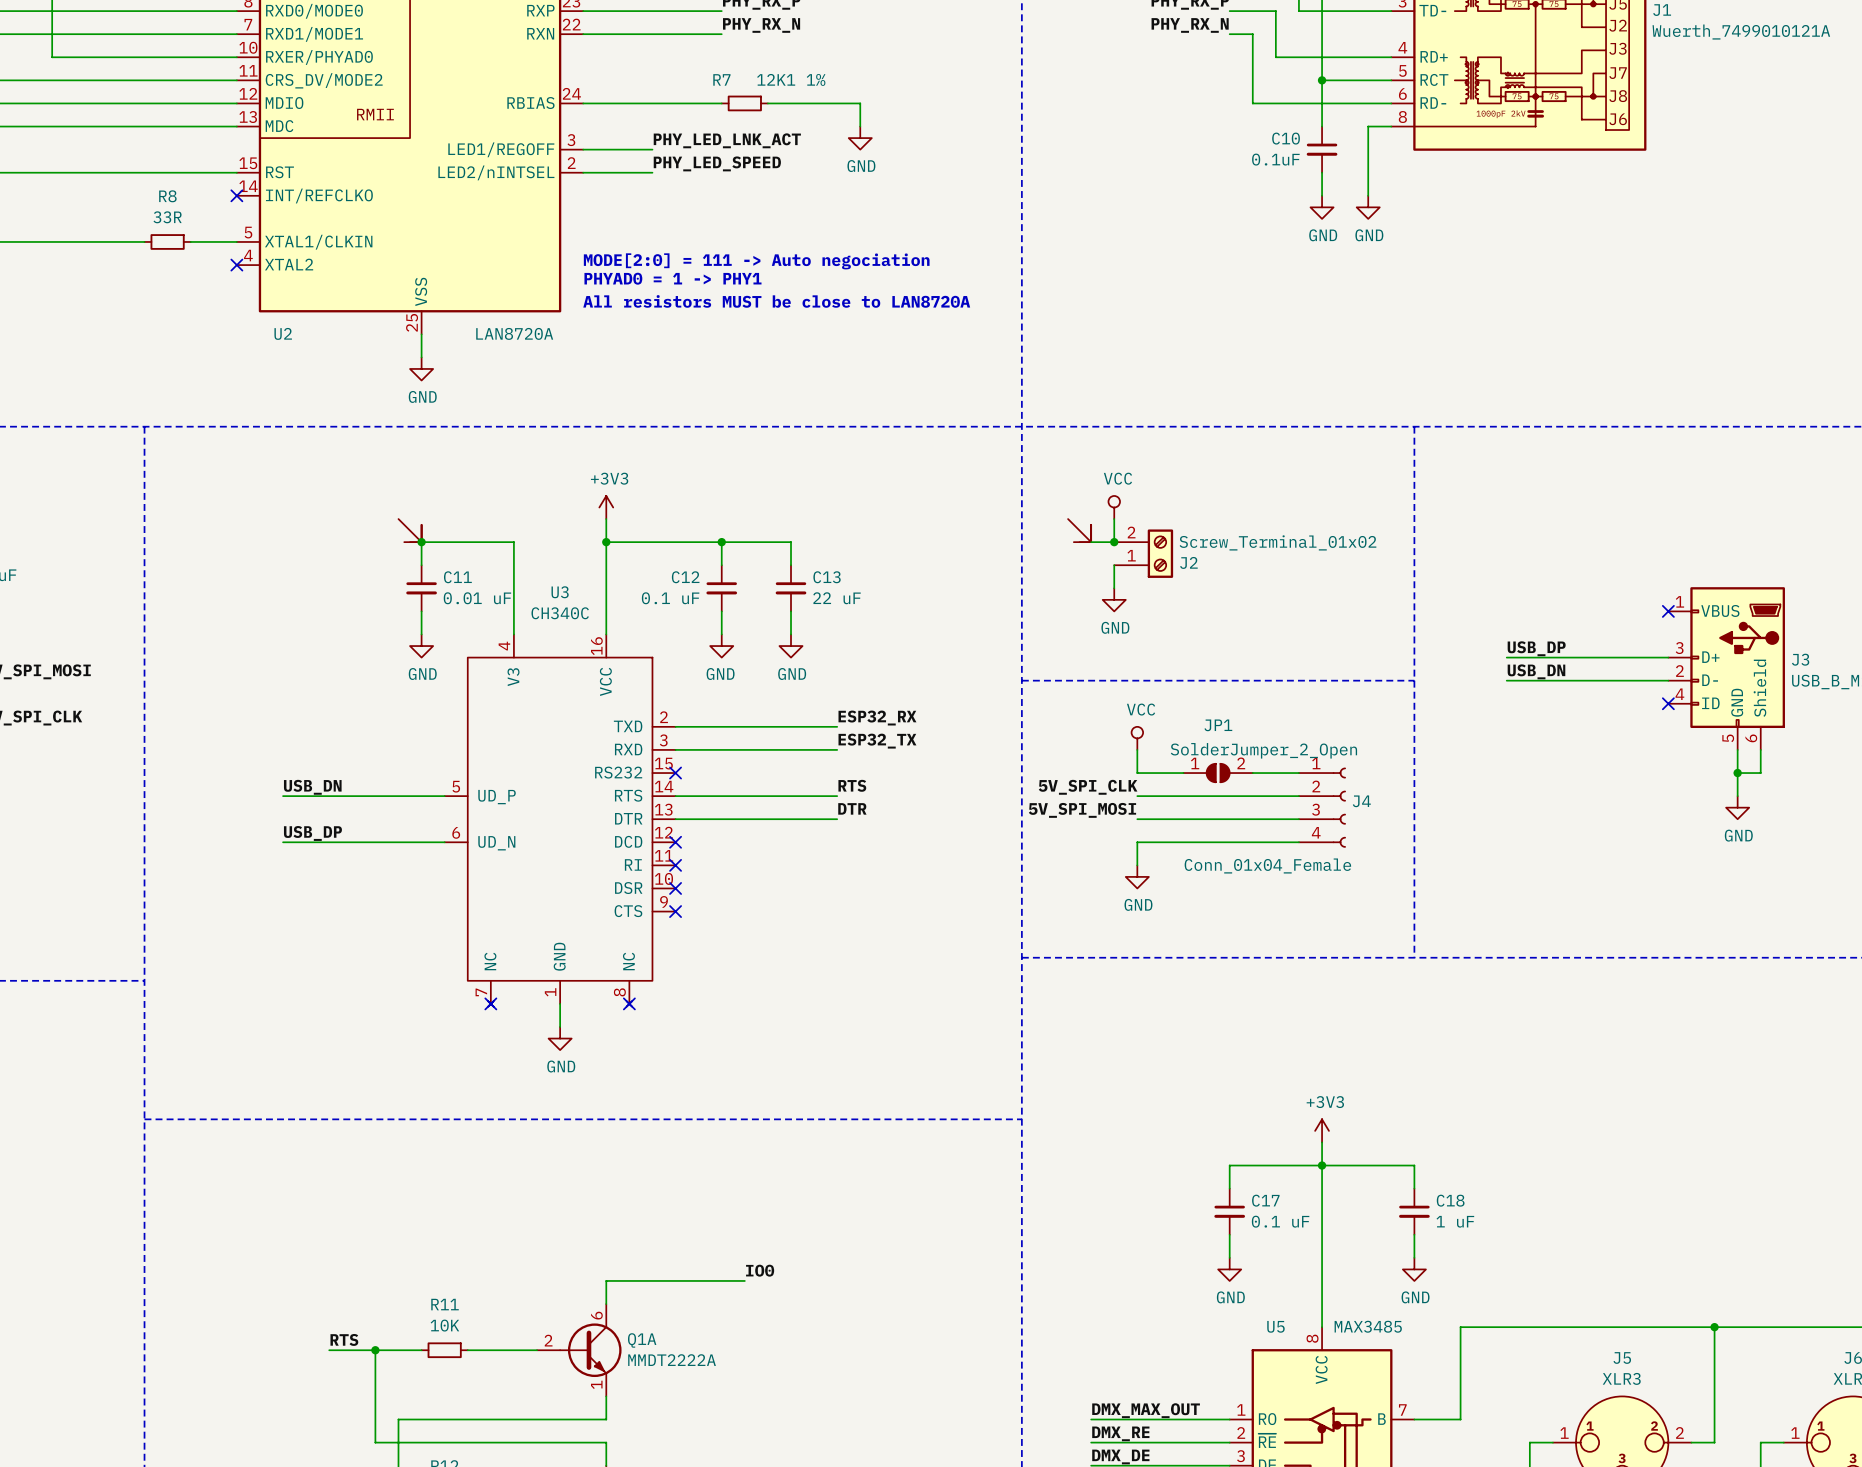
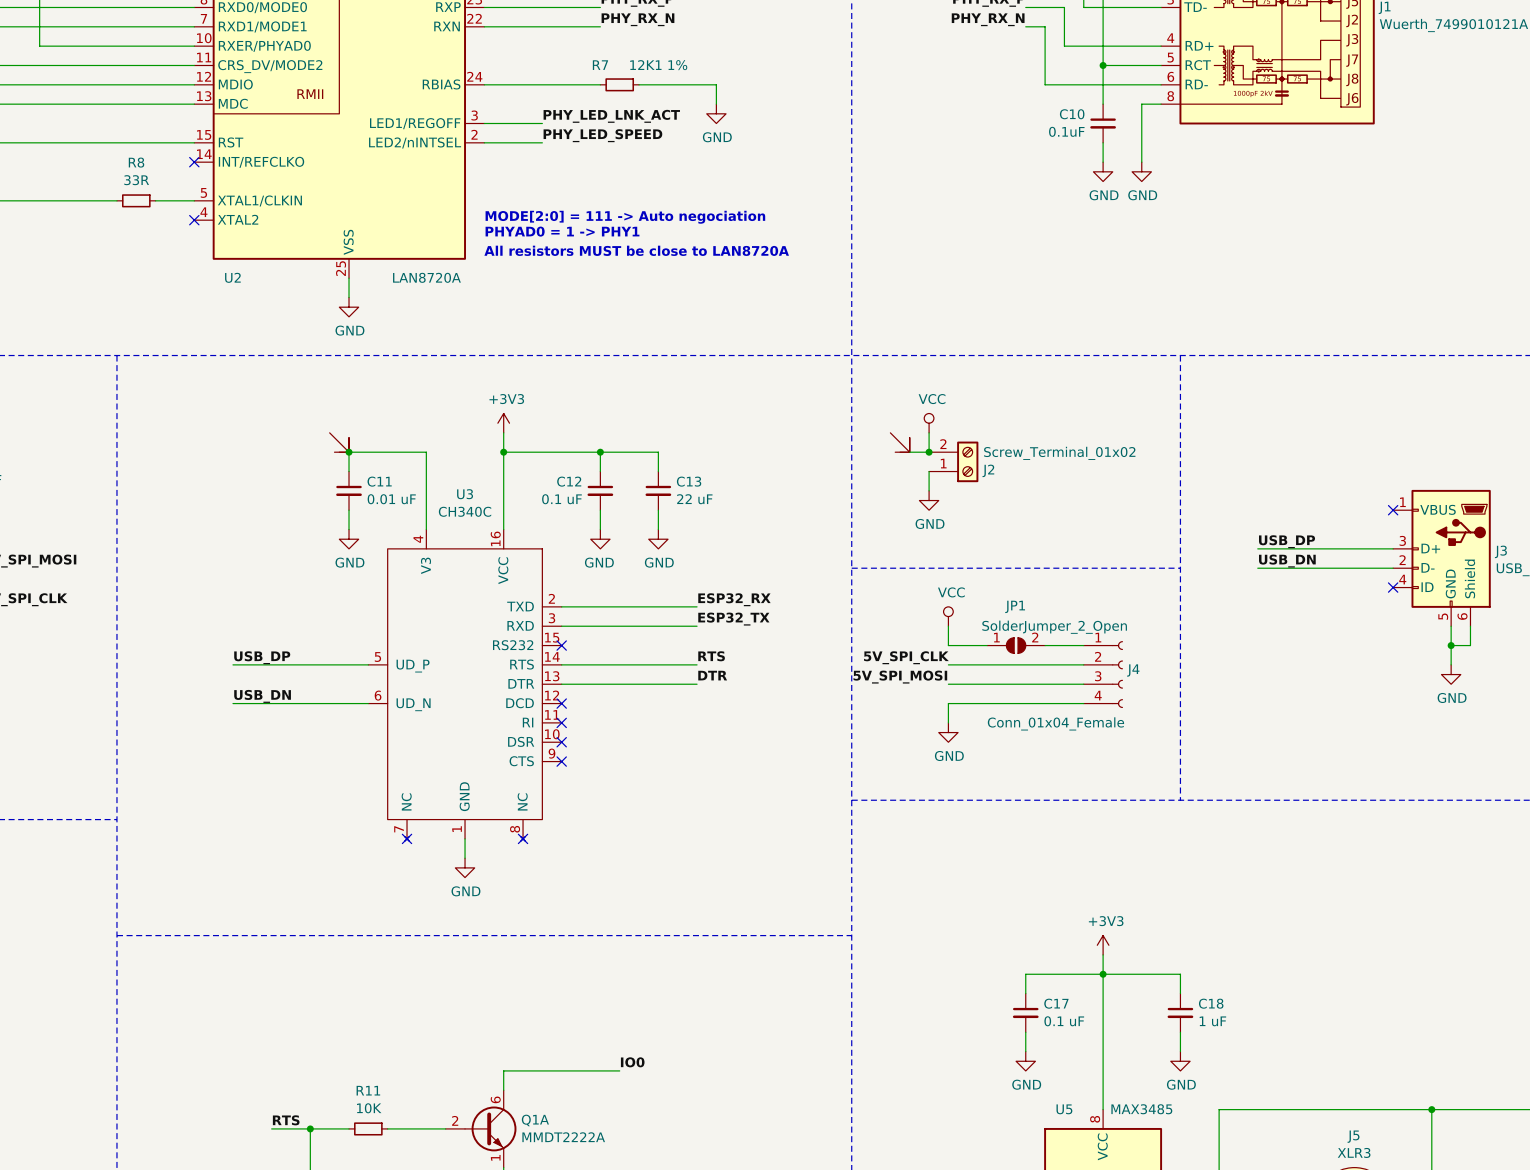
label: USB_DN (312, 787) -> USB_DP (262, 657)
label: USB_DP (312, 833) -> USB_DN (262, 696)

